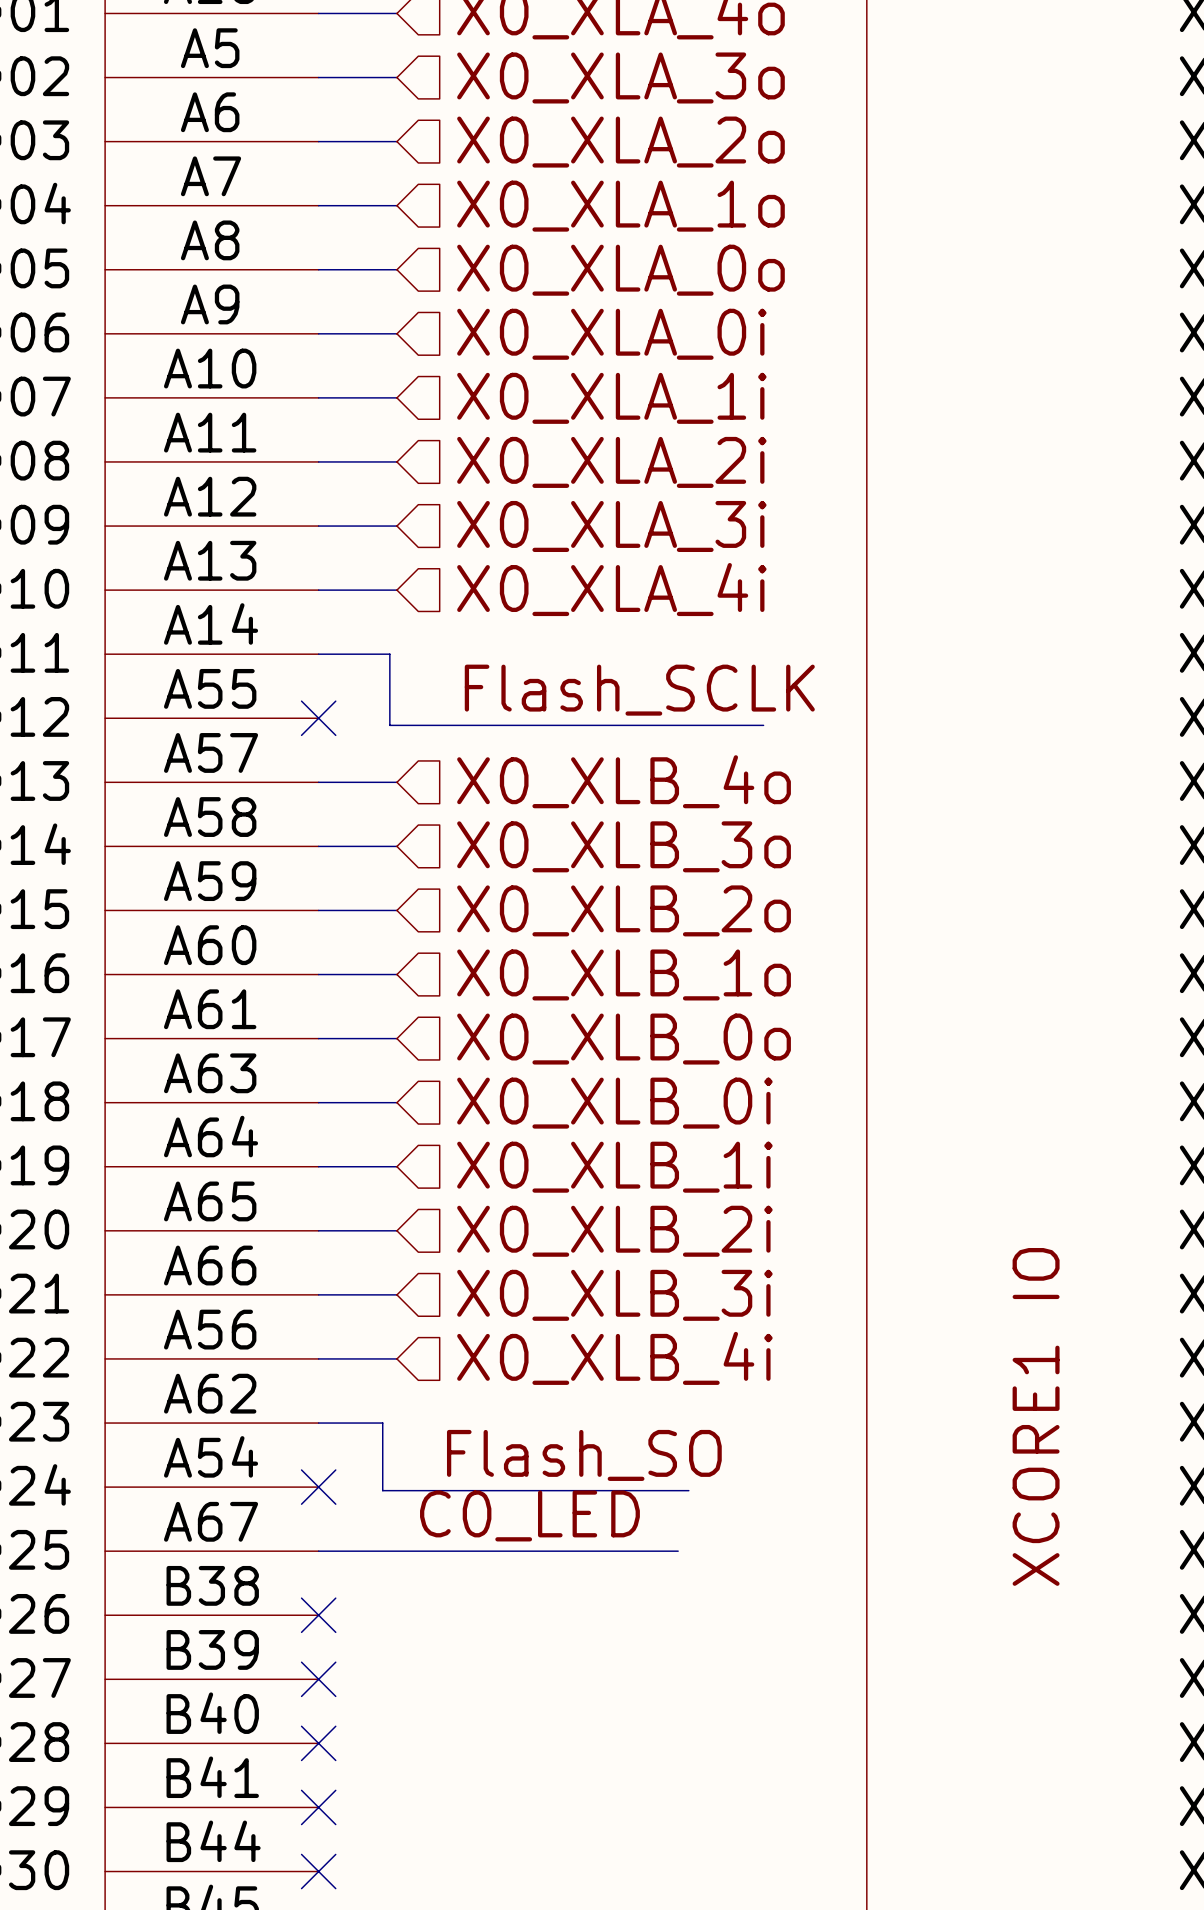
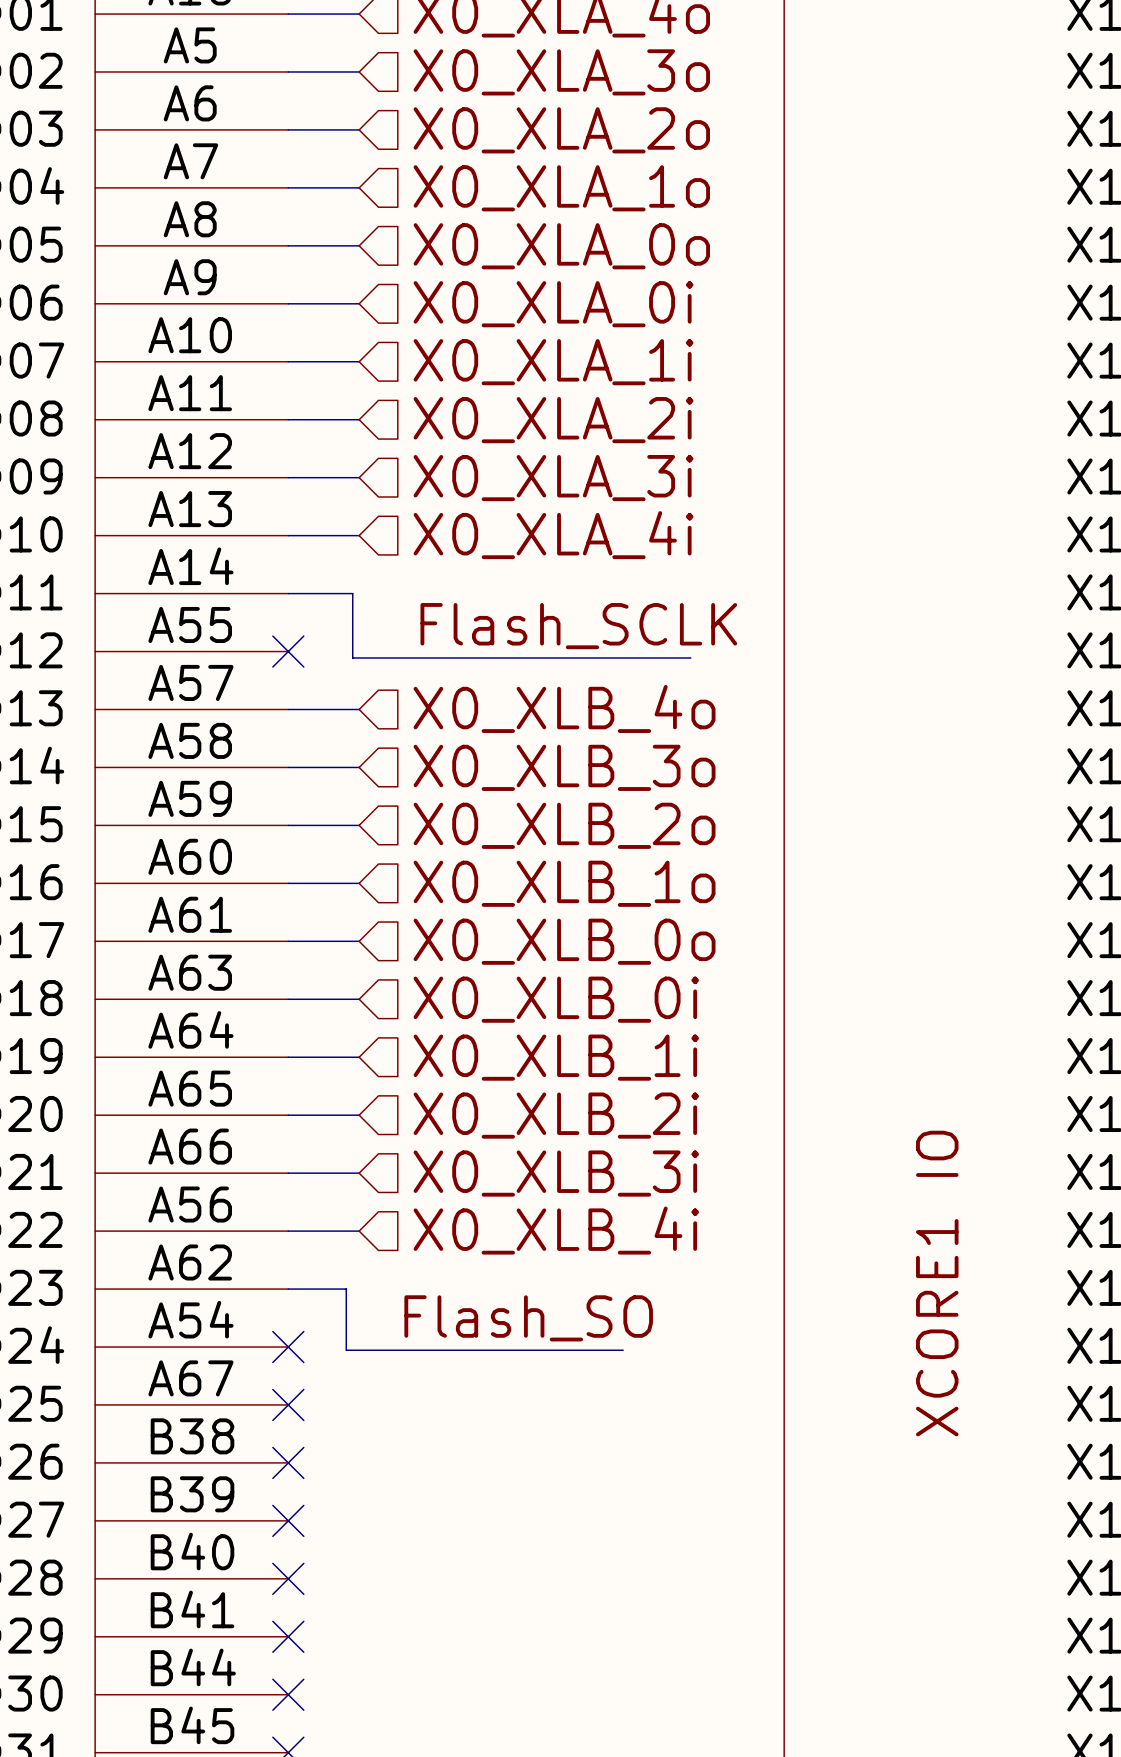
label: C0_LED (529, 1515) -> none
wire: (318, 1551) (678, 1551) -> none
no-connect mark: none -> (288, 1404)

